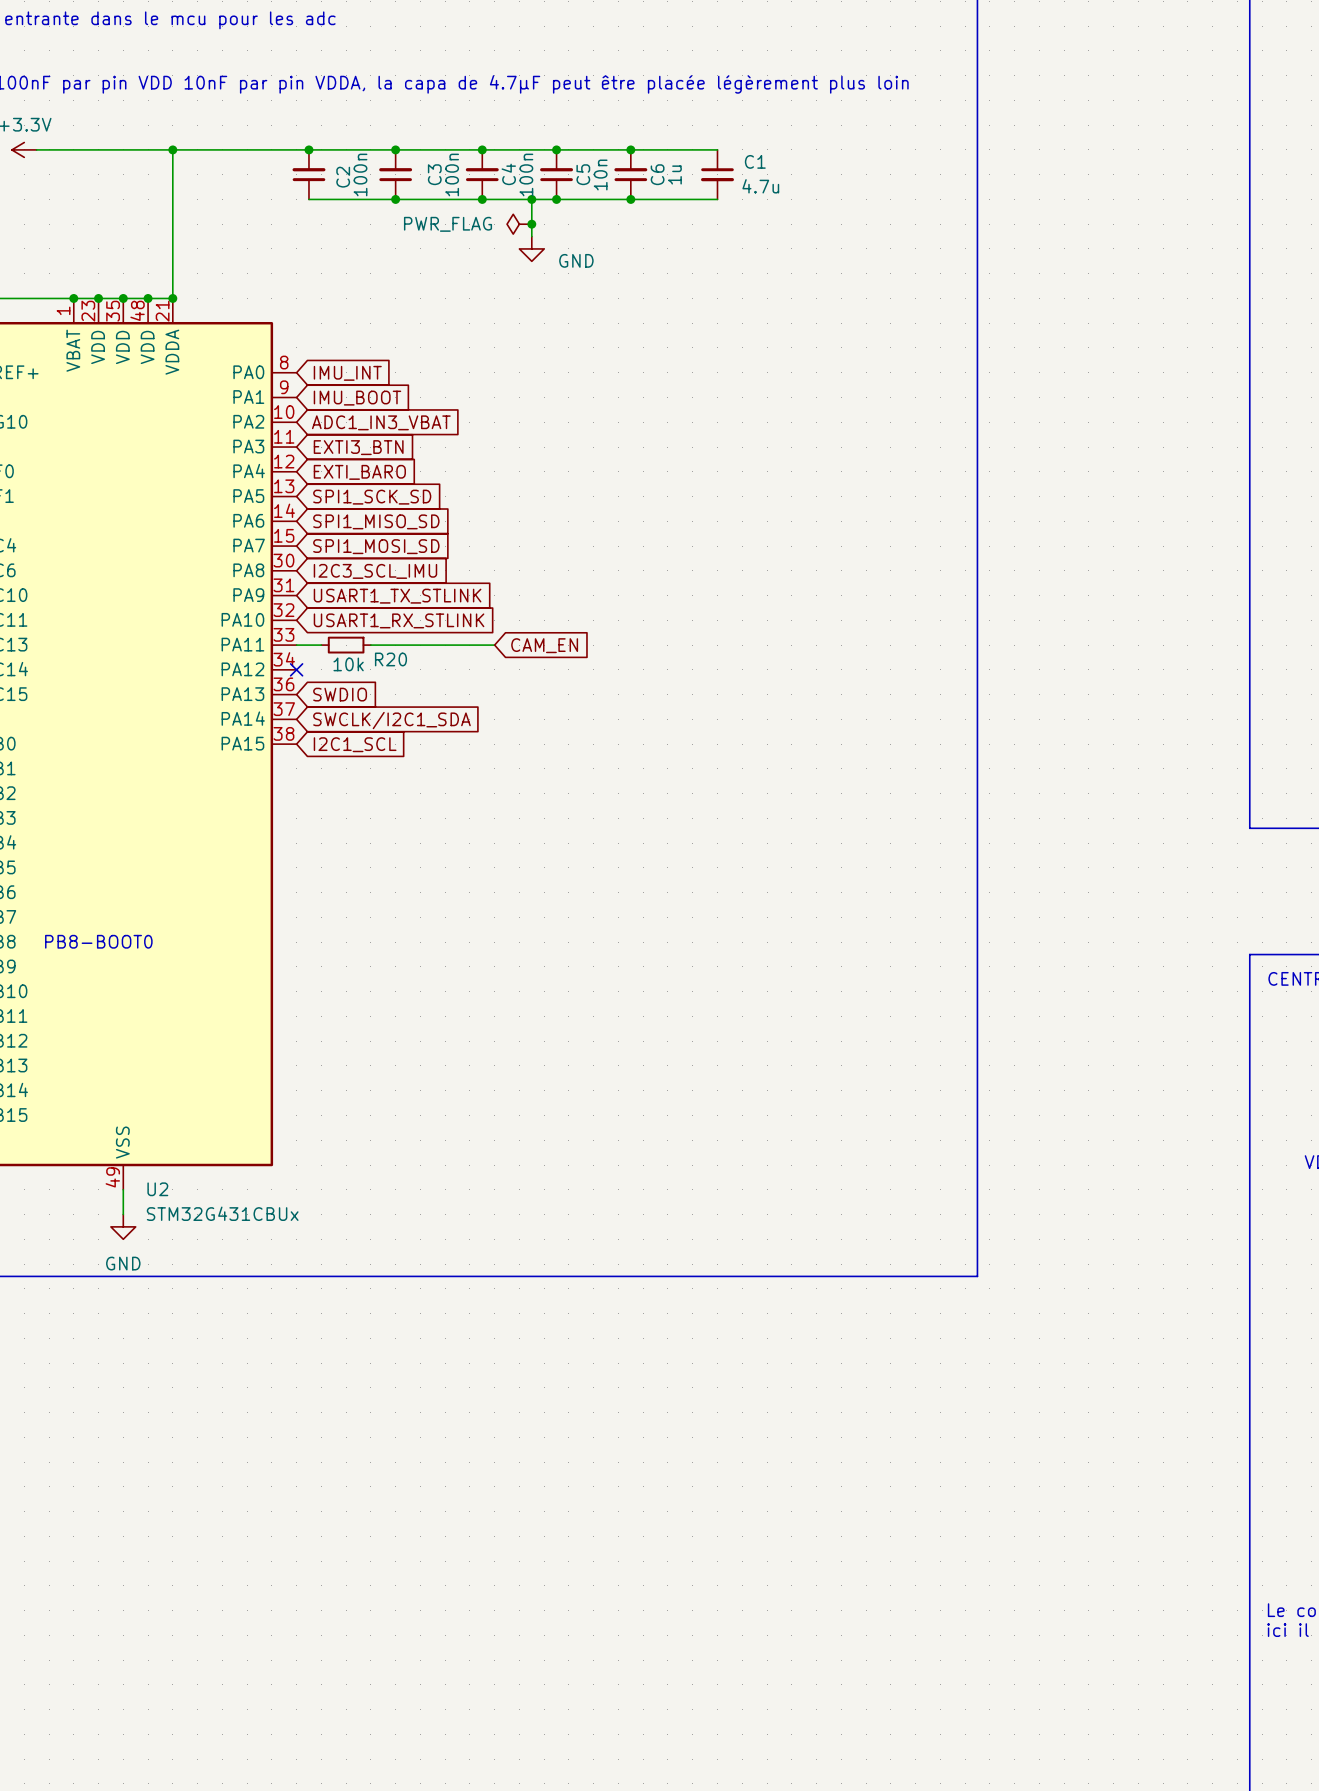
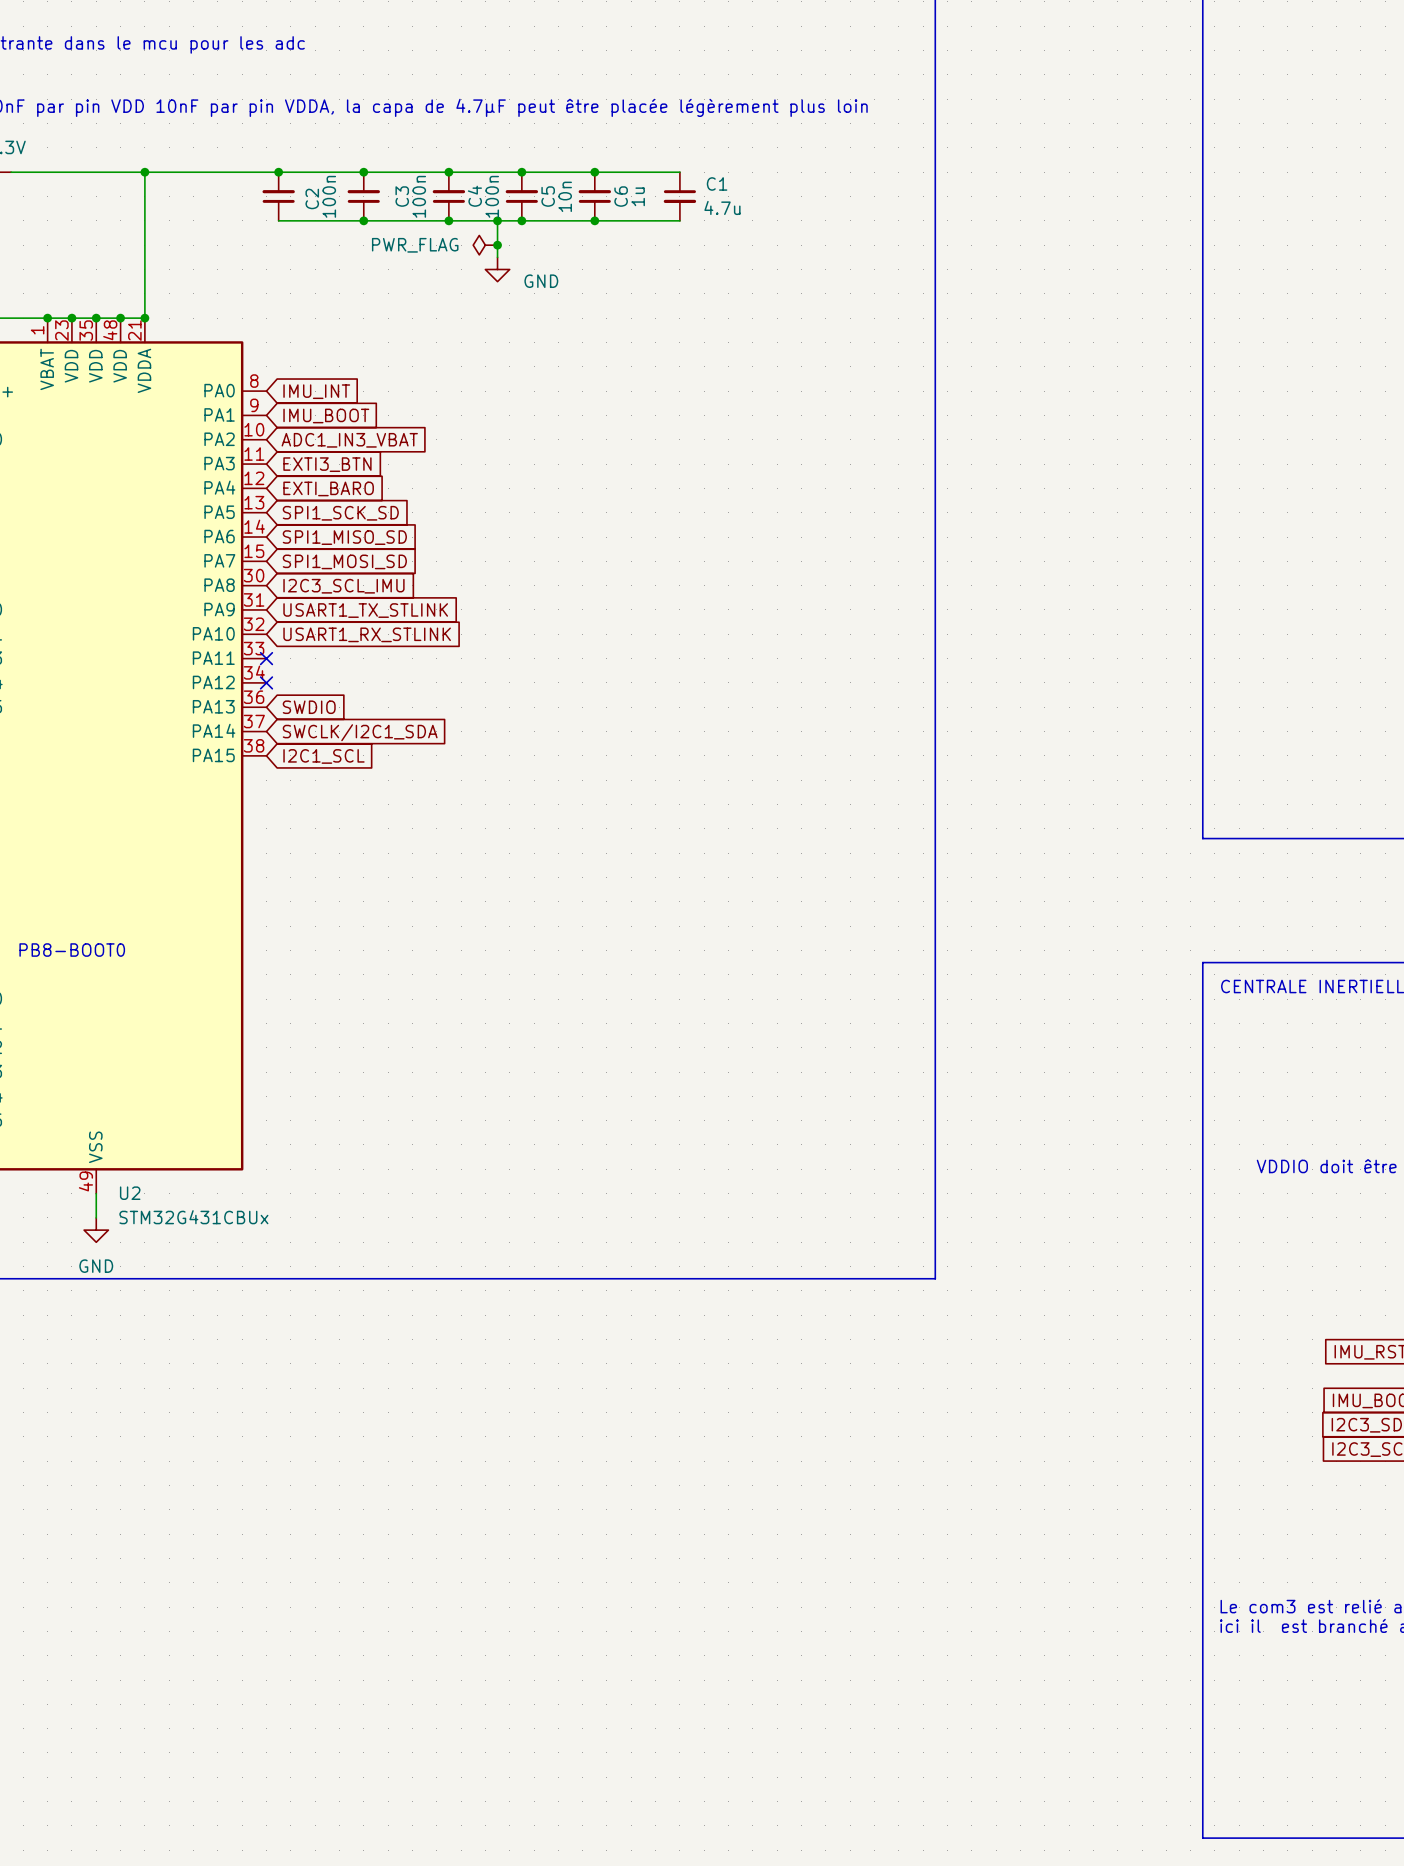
wire: (296, 645) (321, 645) -> none
no-connect mark: none -> (266, 658)
R20: 10k (346, 645) -> none
wire: (370, 645) (494, 645) -> none
global label: CAM_EN (544, 645) -> none

